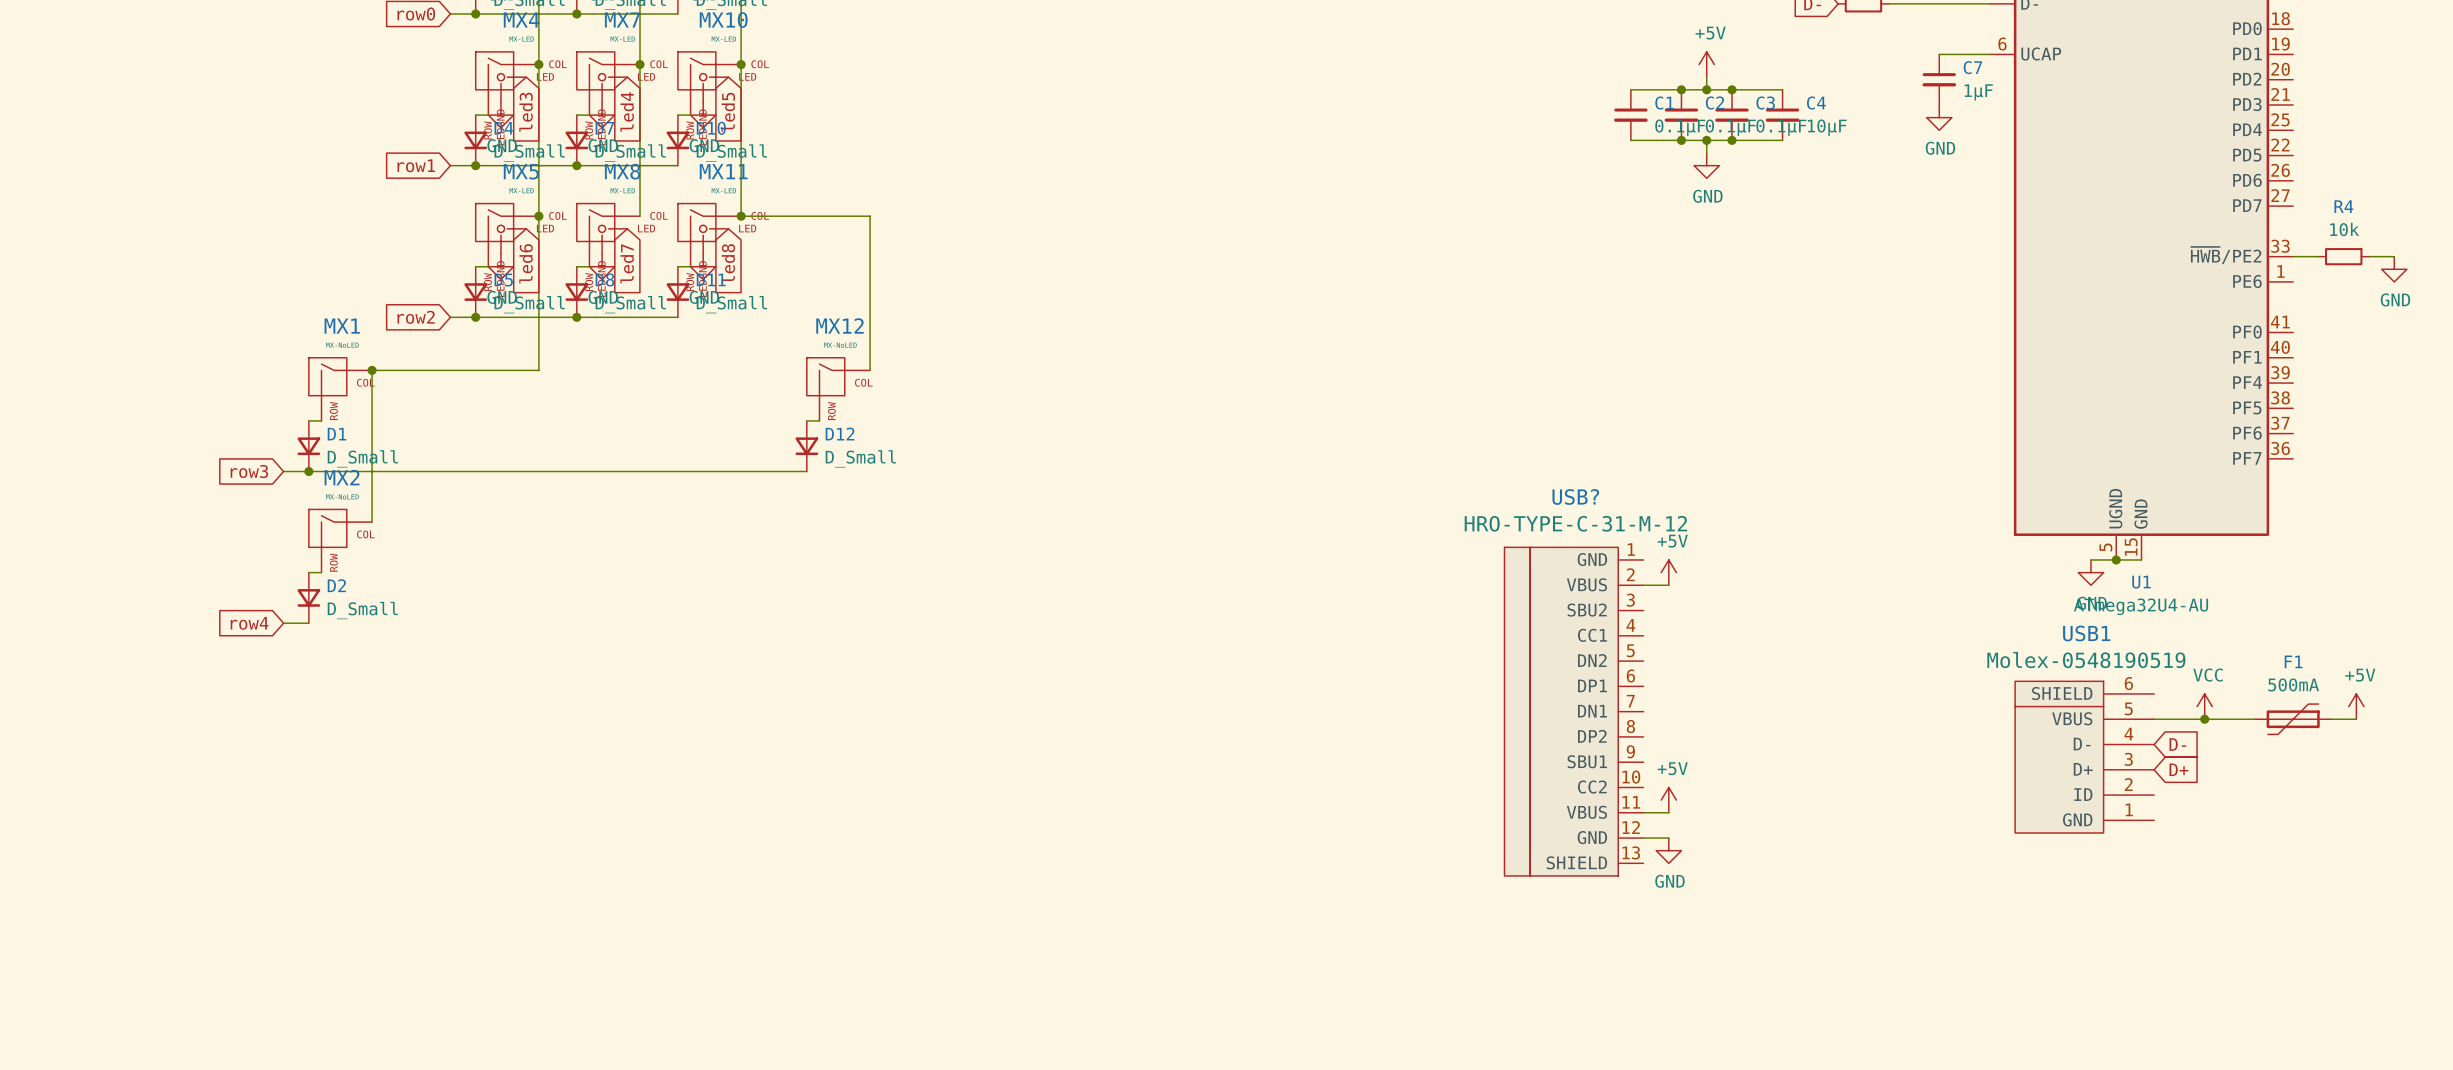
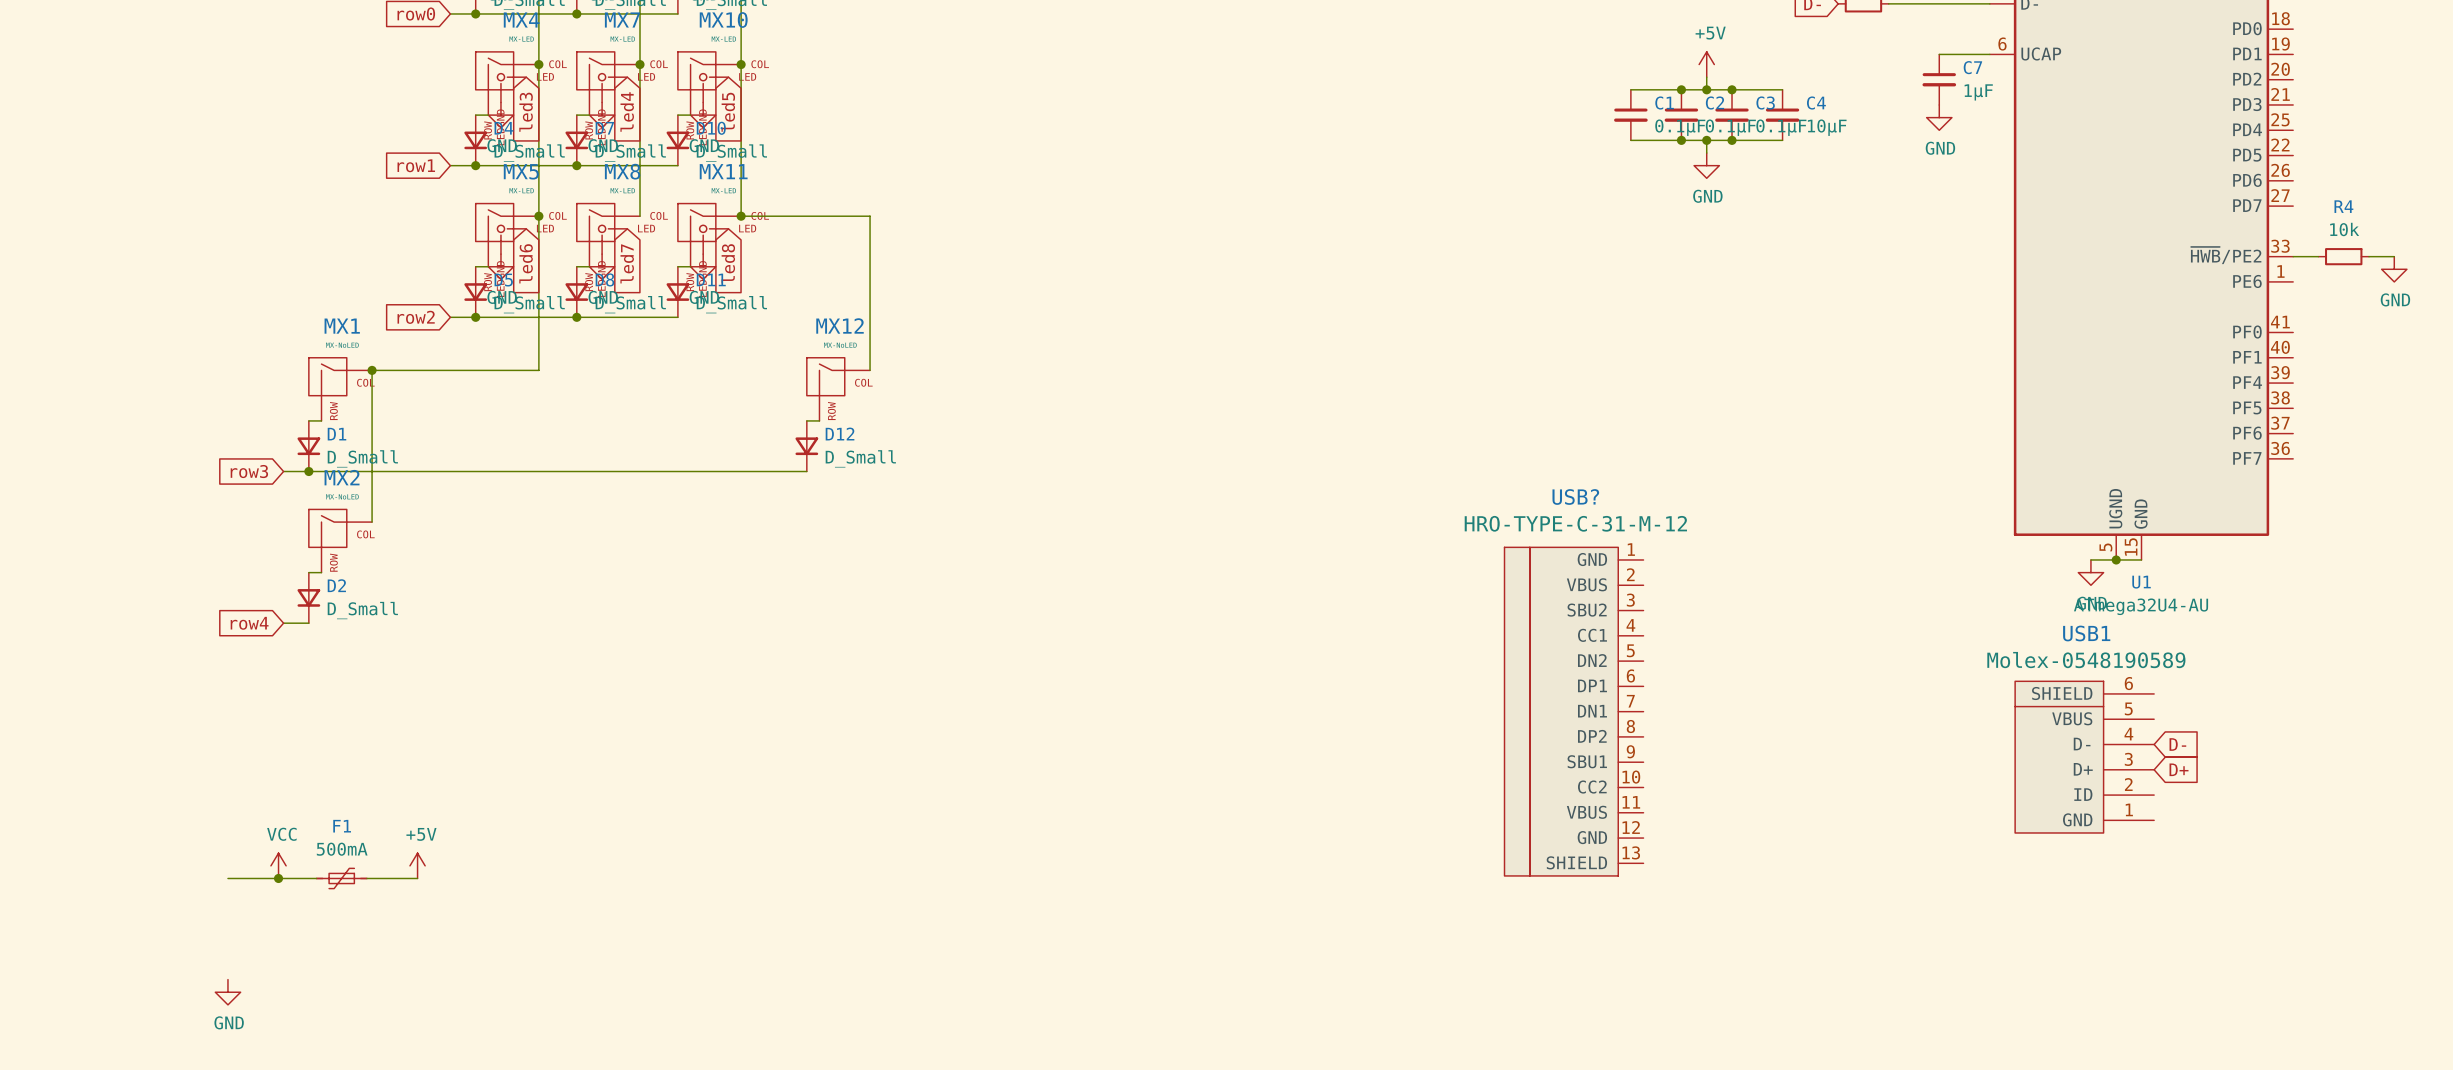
power symbol: +5V (1668, 572) -> none
wire: (1643, 585) (1668, 585) -> none
USB1 value: Molex-0548190519 (2086, 660) -> Molex-0548190589 (2086, 660)
F1 symbol: [2255, 704, 2332, 735] -> [316, 868, 368, 889]
power symbol: VCC (2204, 706) -> none
power symbol: +5V (2356, 706) -> none
wire: (2154, 719) (2255, 719) -> none
junction: (2204, 719) -> none
wire: (2331, 719) (2356, 719) -> none
power symbol: +5V (1668, 800) -> none
wire: (1643, 812) (1668, 812) -> none
wire: (1643, 838) (1668, 838) -> none
power symbol: GND (1668, 850) -> none
power symbol: none -> VCC (278, 865)
power symbol: none -> +5V (417, 865)
wire: none -> (227, 878) (316, 878)
junction: none -> (278, 878)
wire: none -> (367, 878) (417, 878)
power symbol: none -> GND (227, 992)

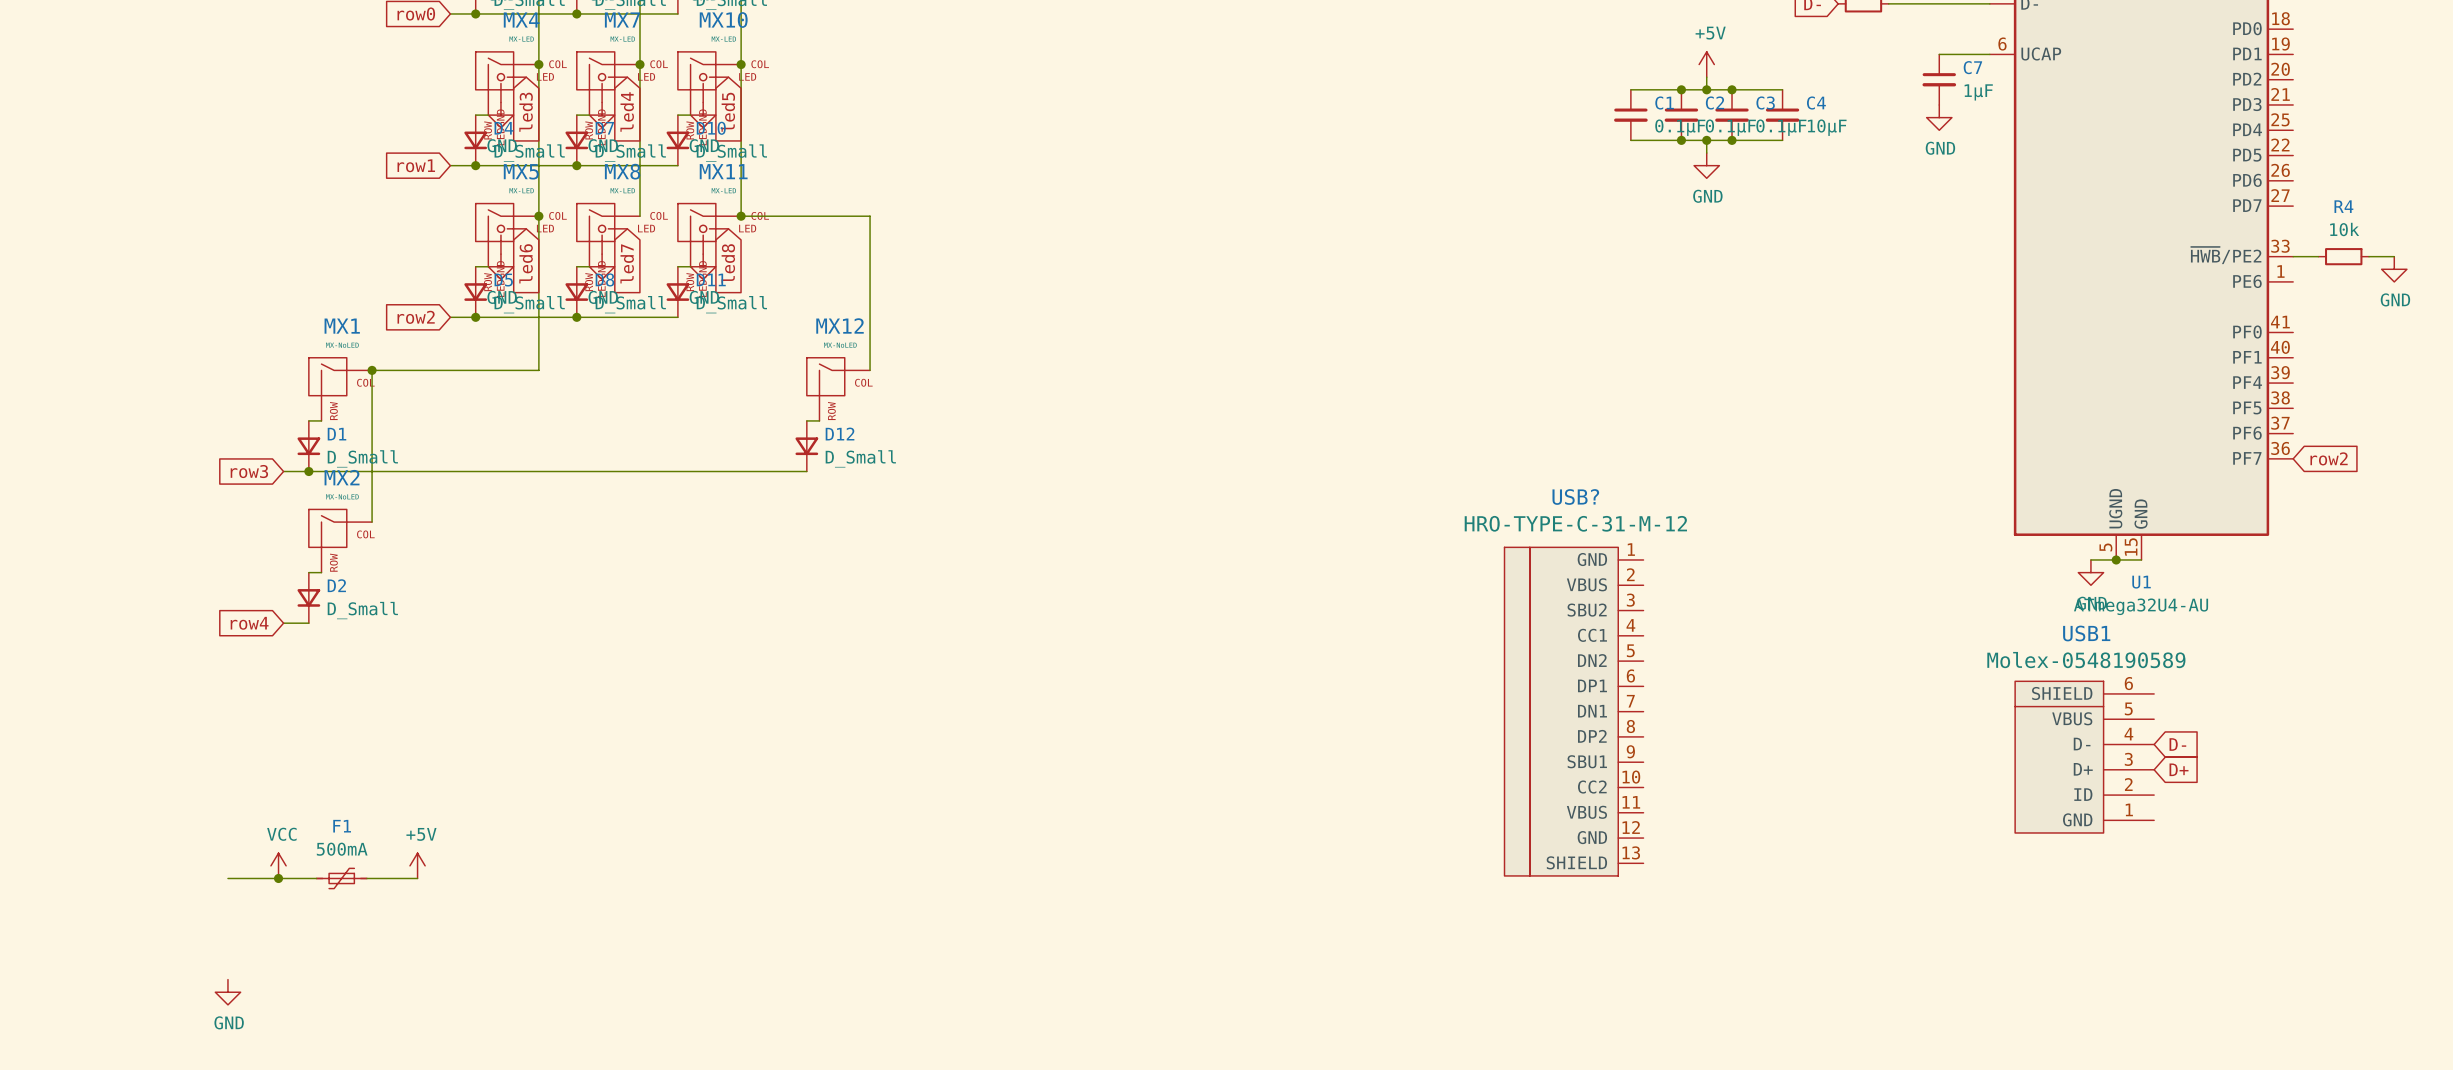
global label: none -> row2 (2329, 458)

